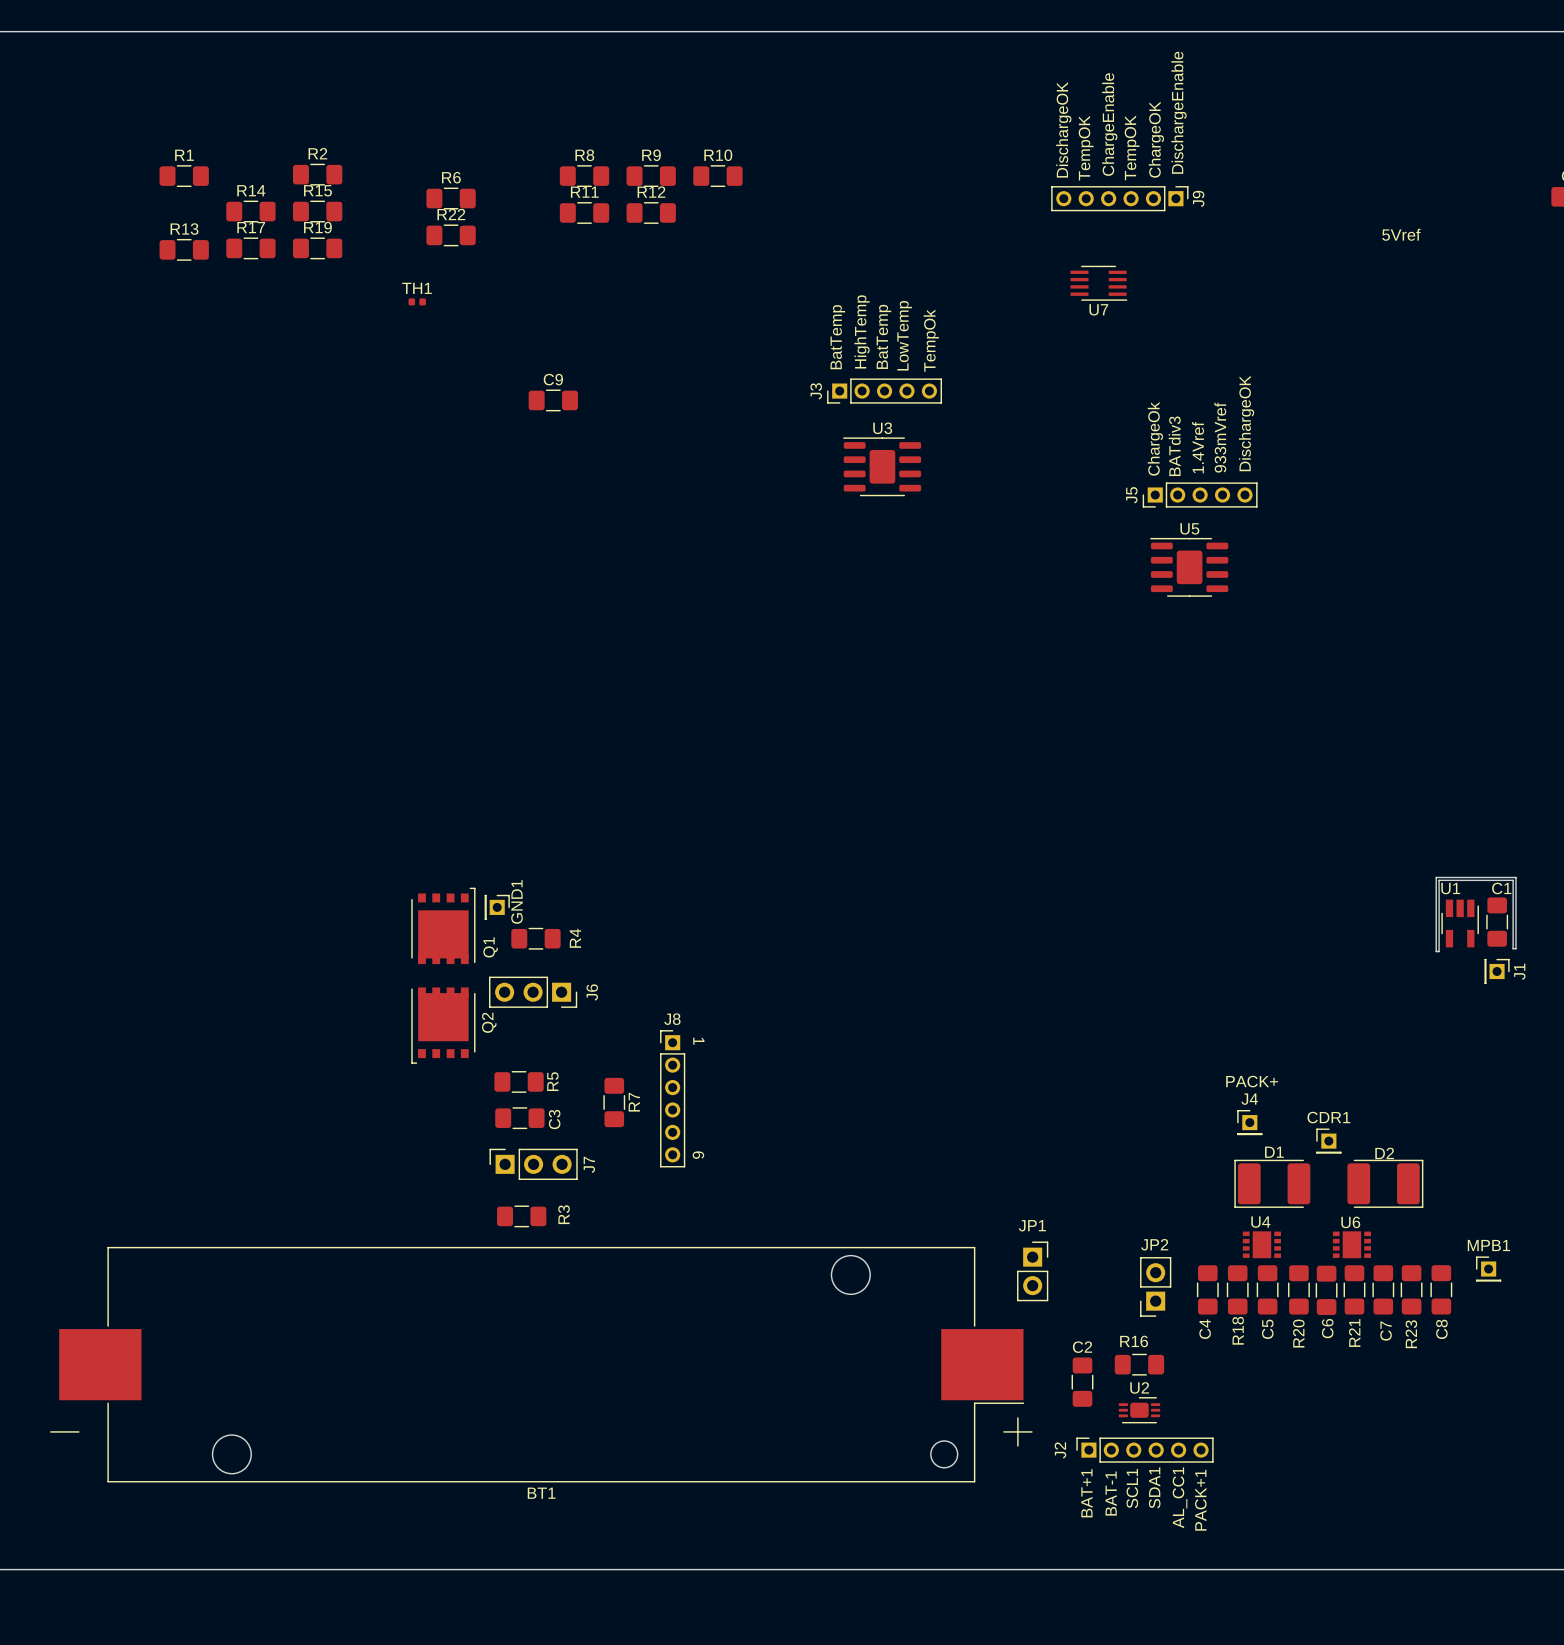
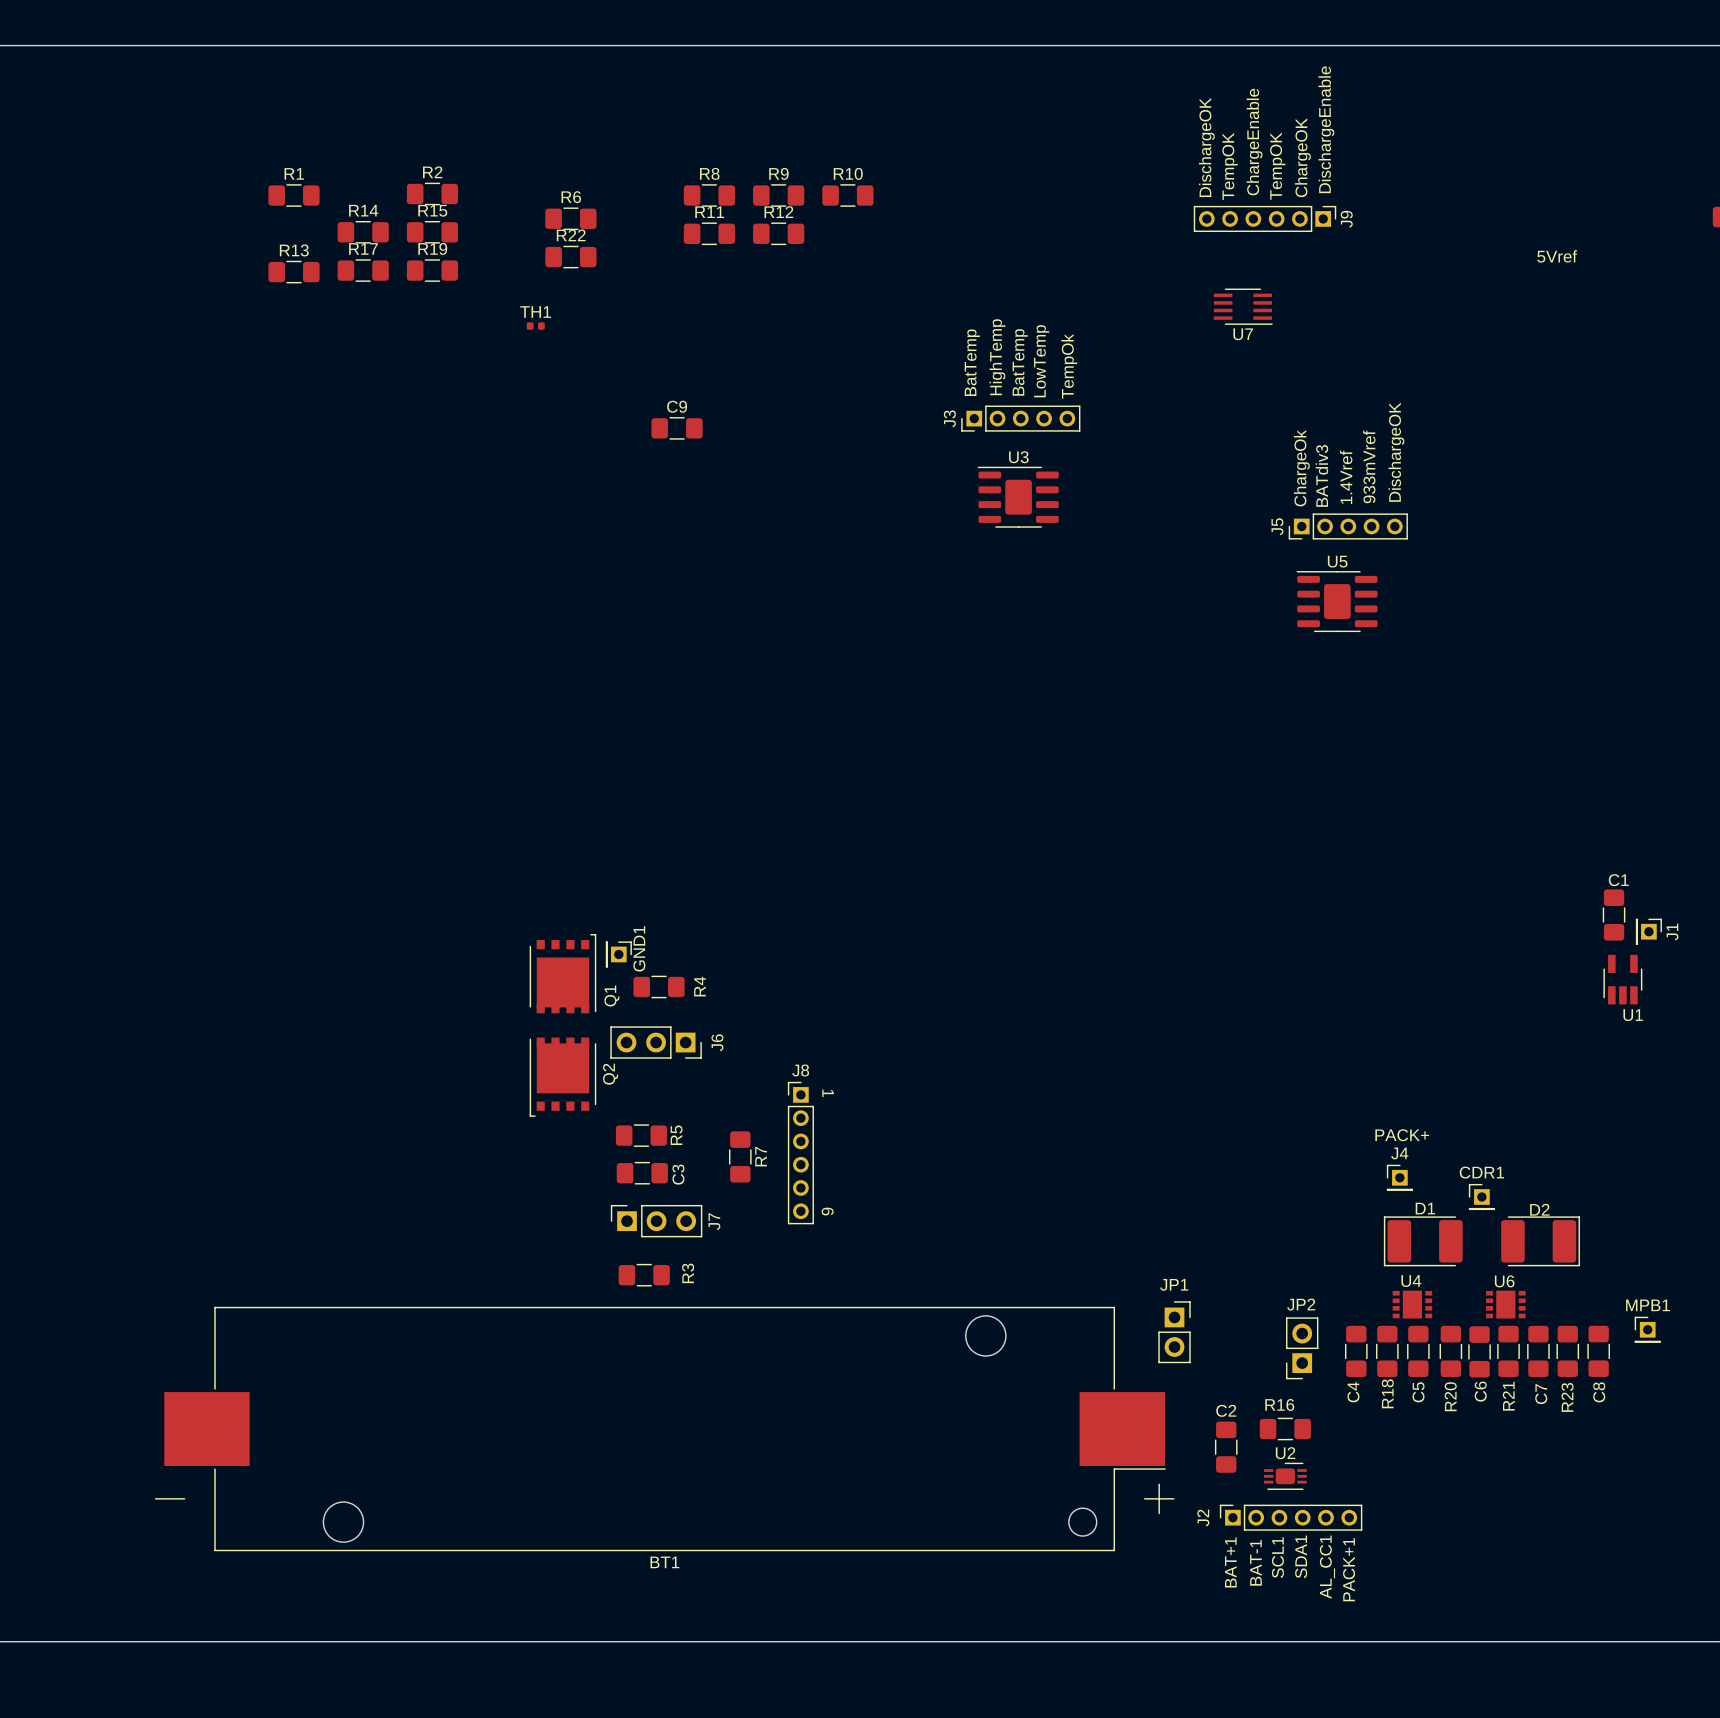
board edge: (1436, 877) (1436, 951) (1439, 951) (1439, 880) (1513, 880) (1513, 948) (1515, 948) (1515, 877) (1436, 877) -> none
C1 position: (1497, 922) -> (1614, 915)
U1 rotation: 0° (1460, 923) -> 180° (1622, 979)
J1 position: (1497, 971) -> (1648, 931)

